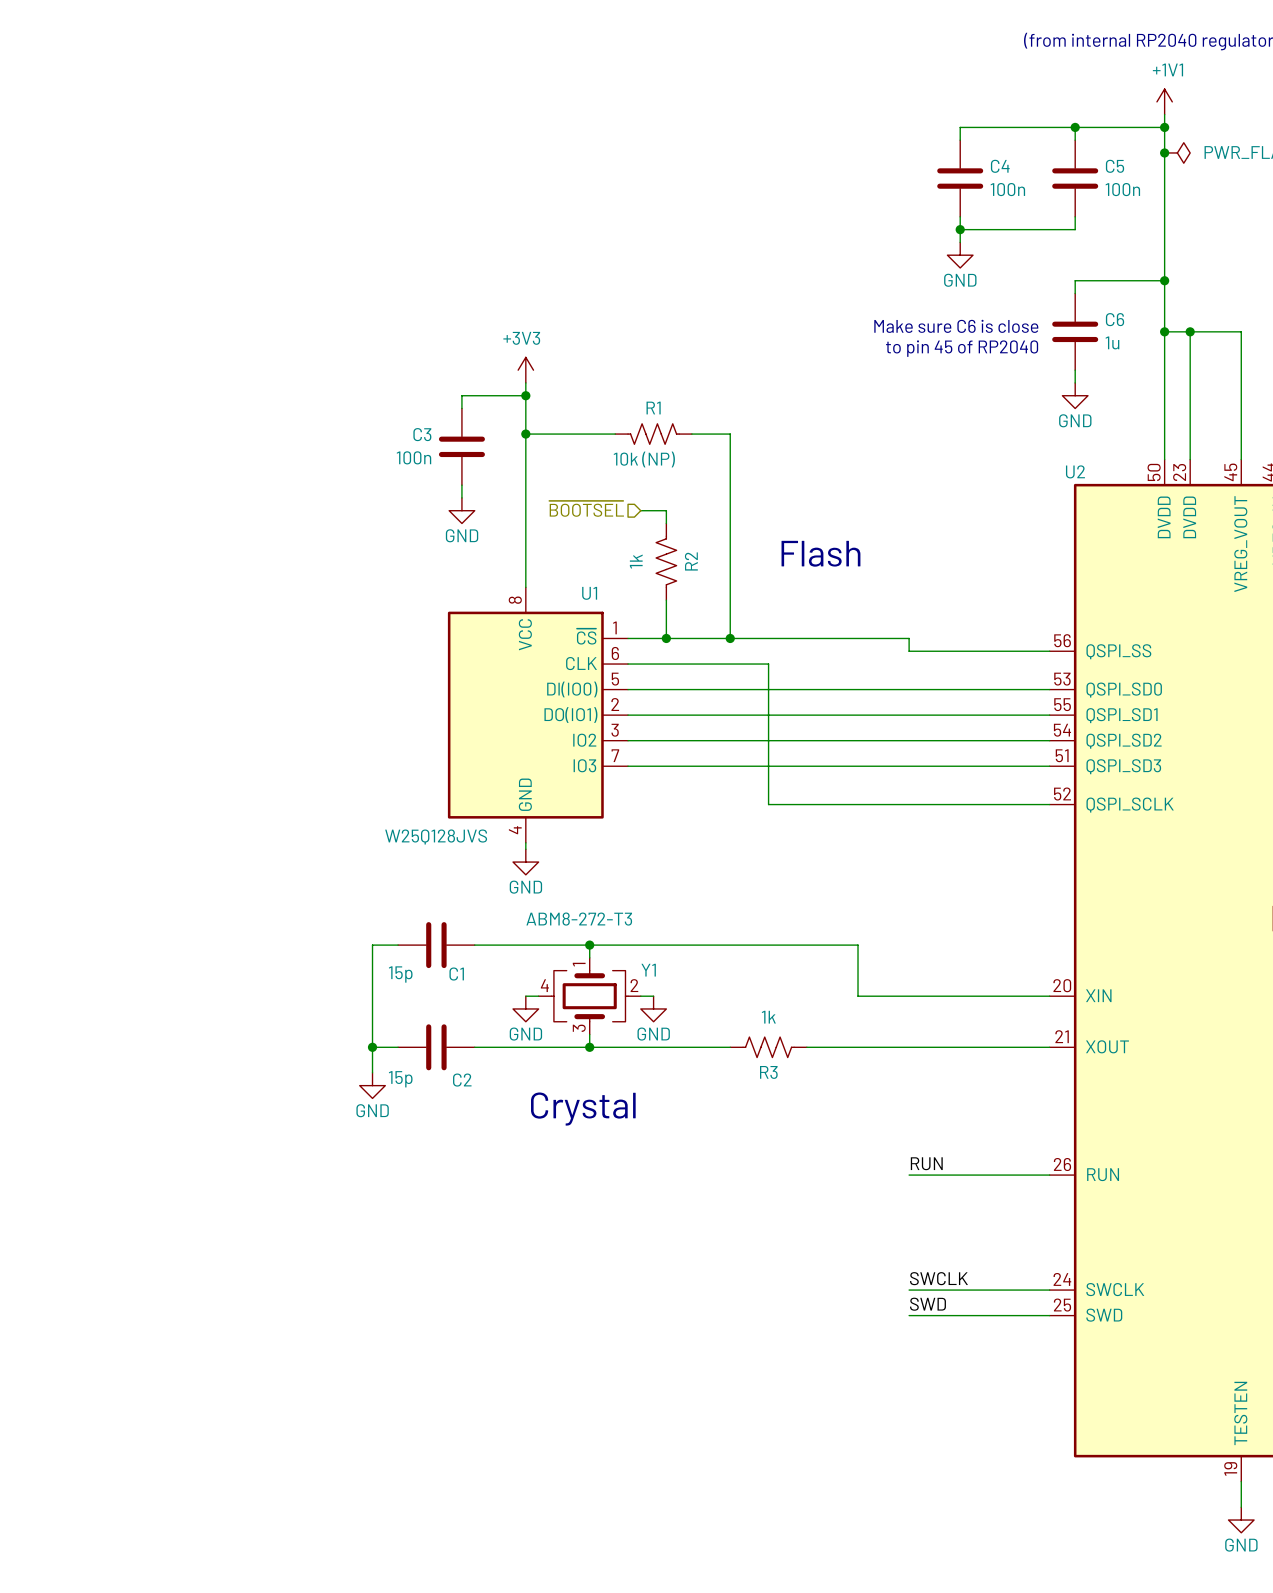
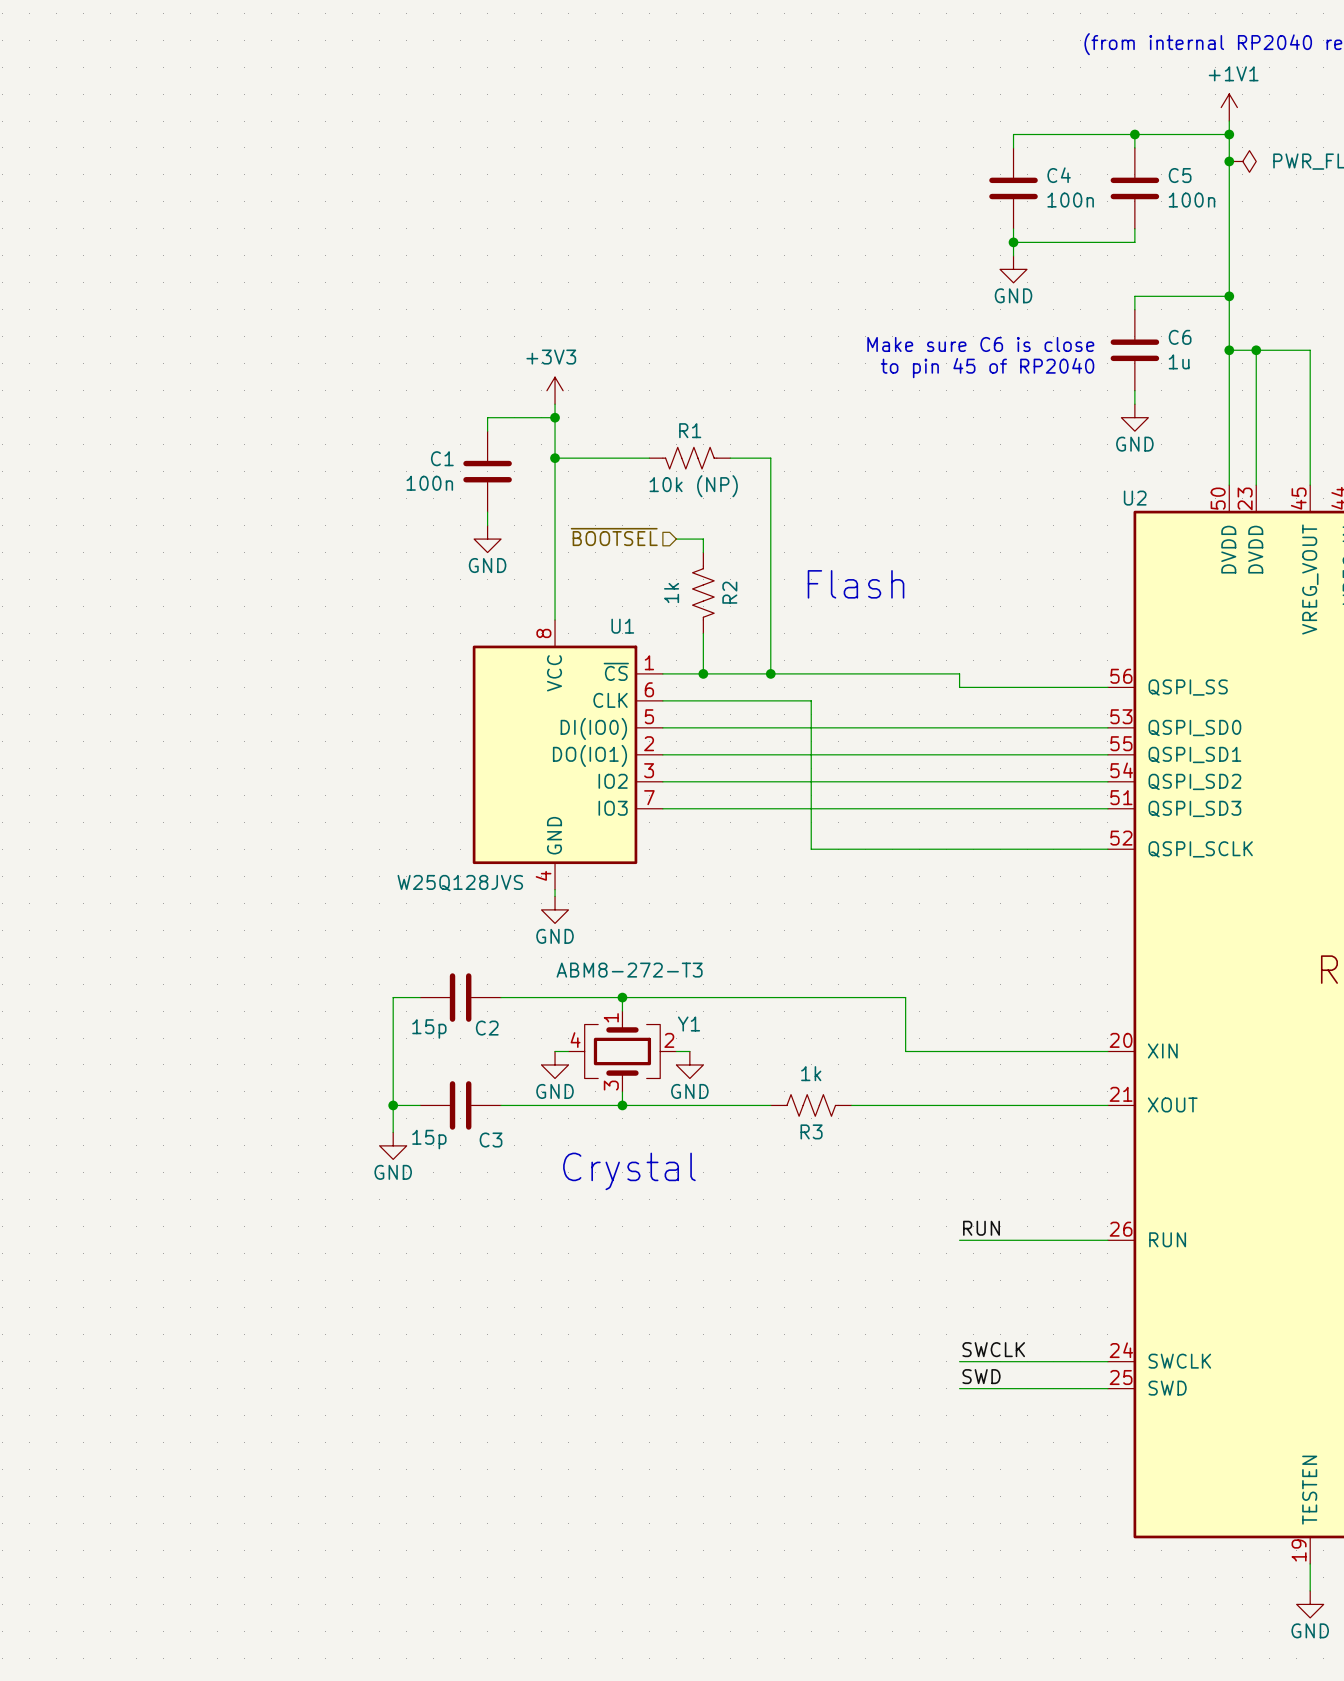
C3 name: C3 (422, 434) -> C1 (442, 458)
C1 name: C1 (456, 974) -> C2 (487, 1028)
C2 name: C2 (462, 1080) -> C3 (491, 1140)

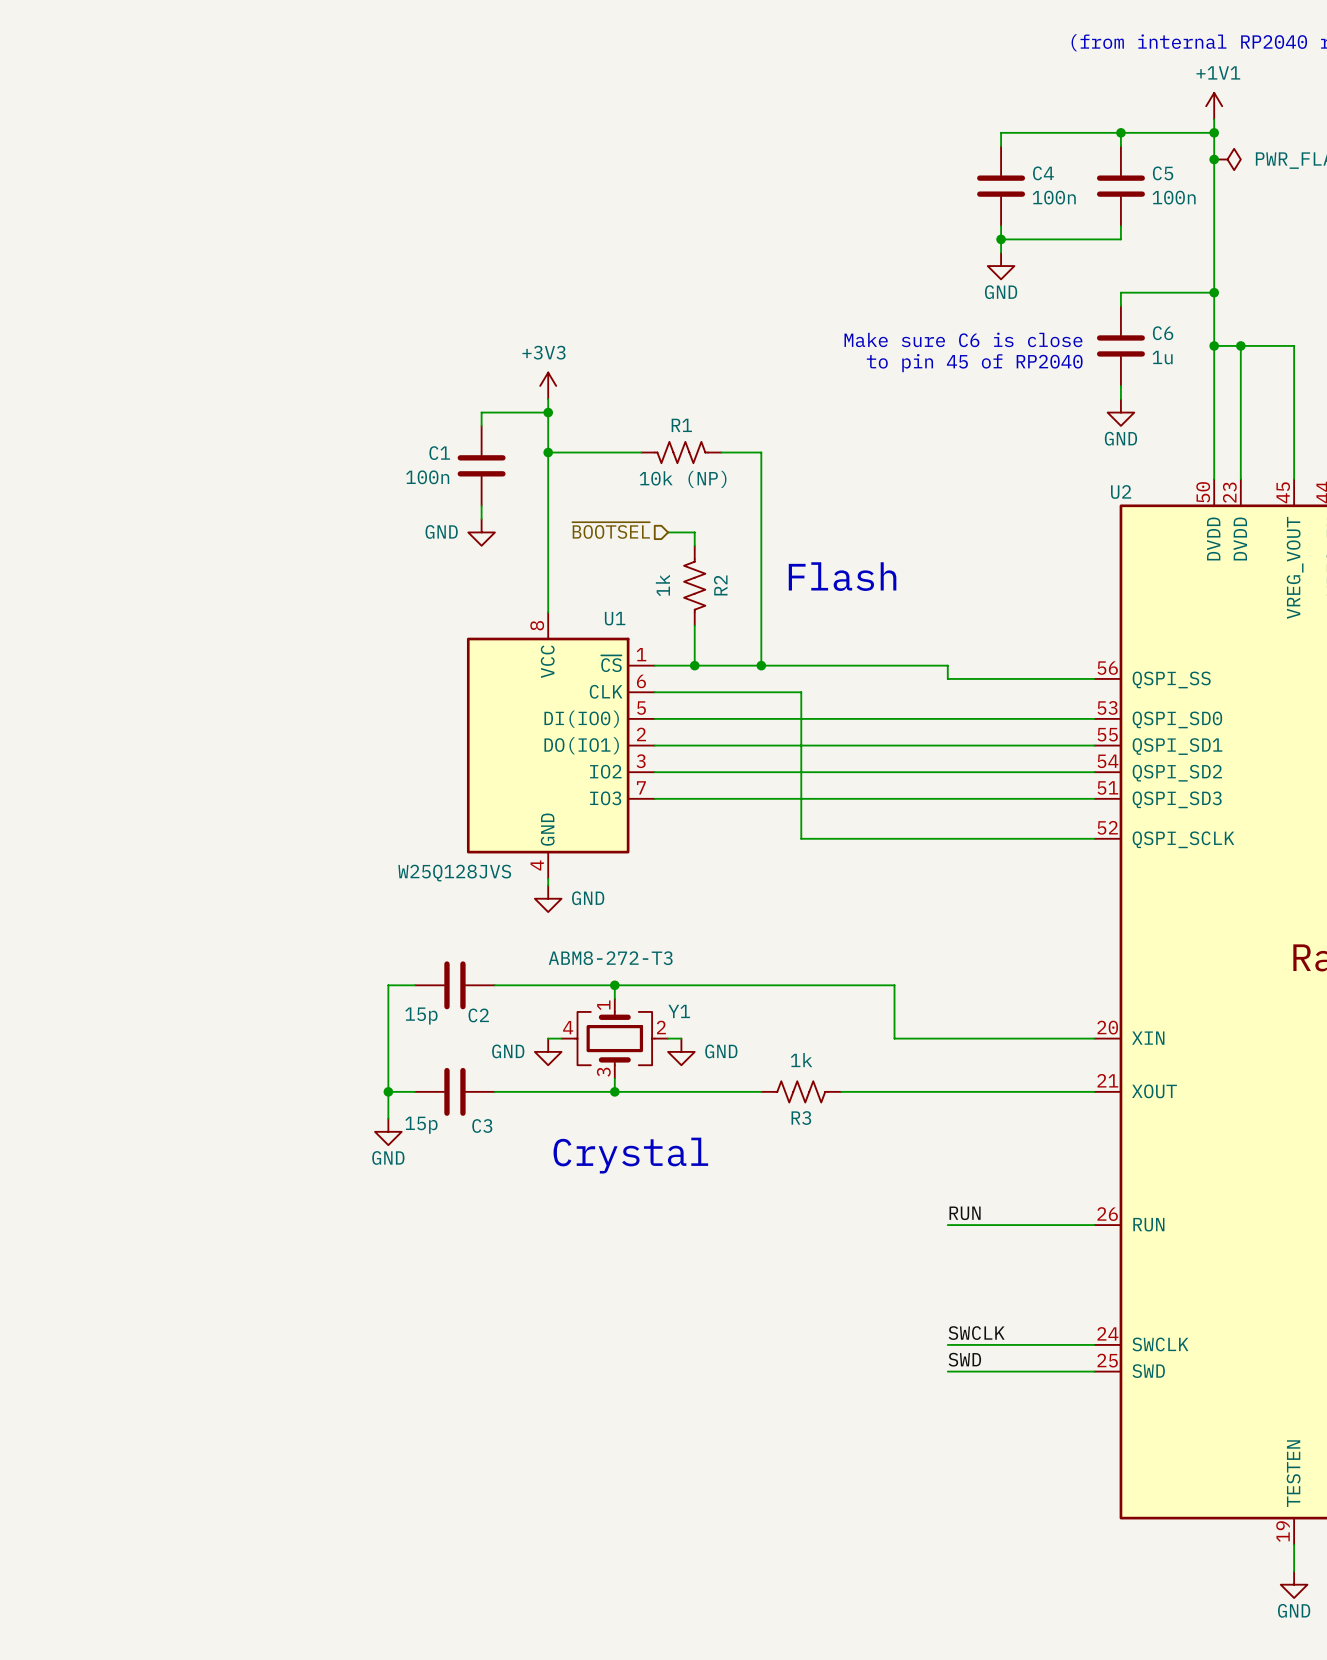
power symbol text position: GND (487, 565) -> GND (441, 531)
power symbol text position: GND (555, 936) -> GND (588, 898)
power symbol text position: GND (555, 1091) -> GND (508, 1051)
power symbol text position: GND (689, 1091) -> GND (721, 1051)

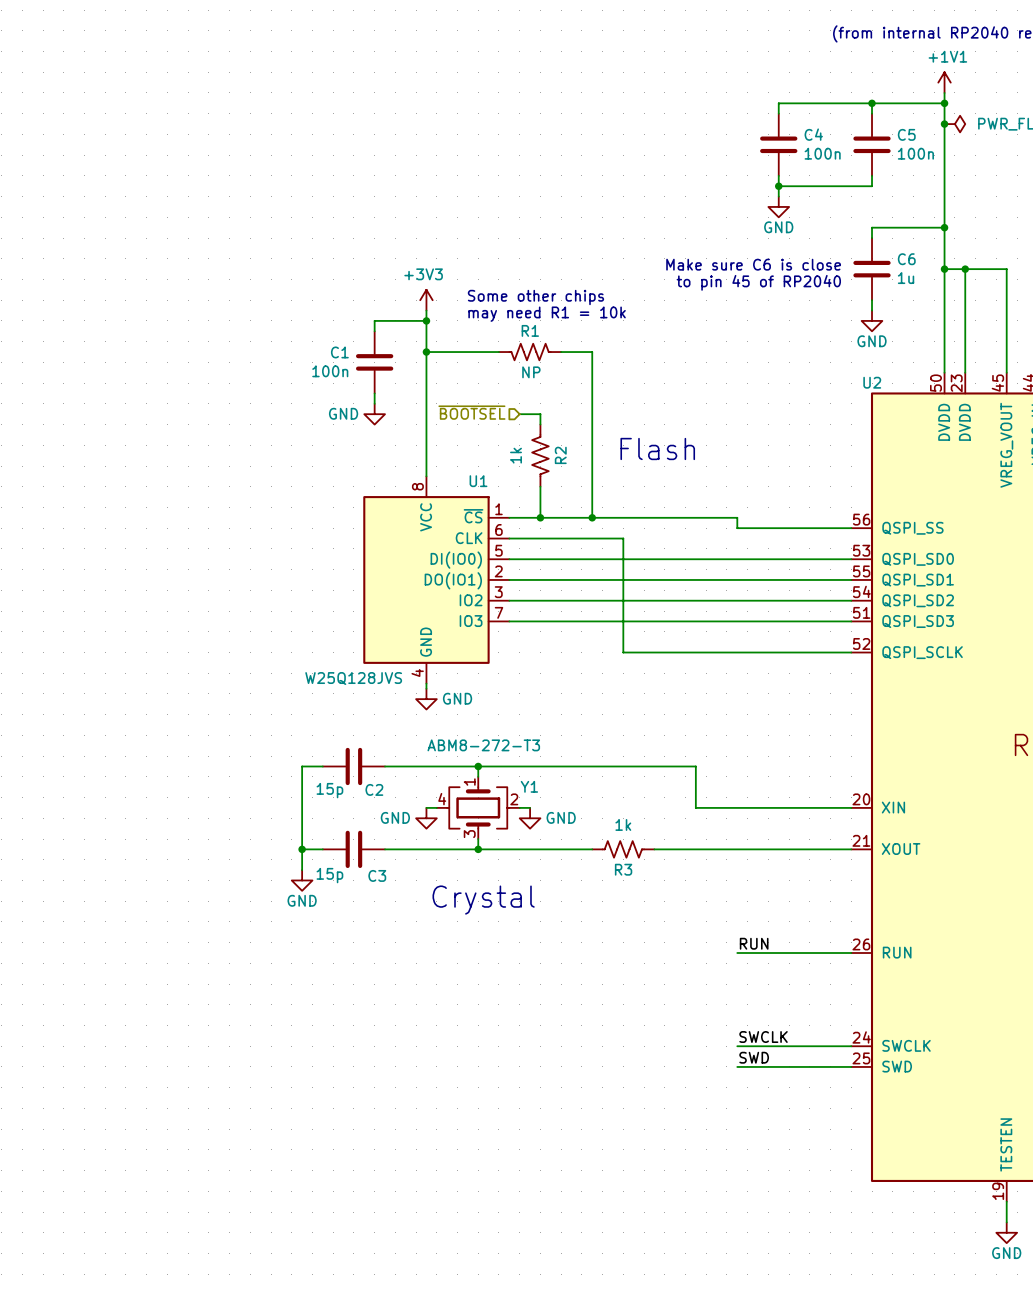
text: none -> Some other chips (535, 297)
text: none -> may need R1 = 10k (547, 314)
R1 value: 10k (NP) (683, 479) -> NP (531, 372)

